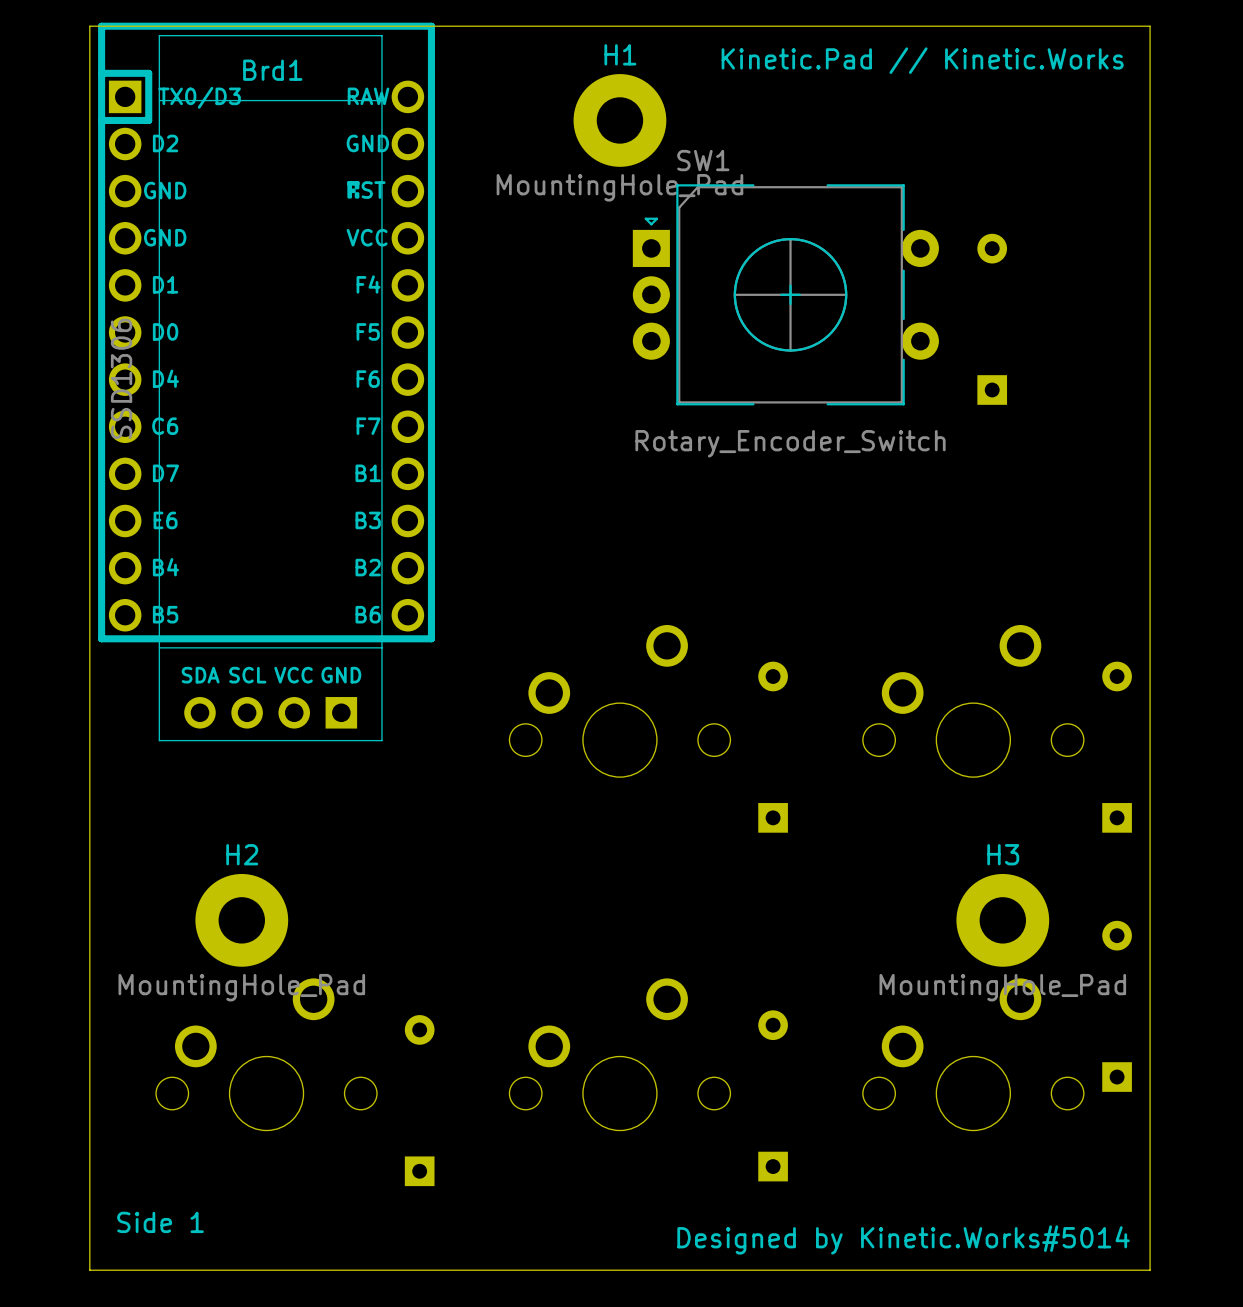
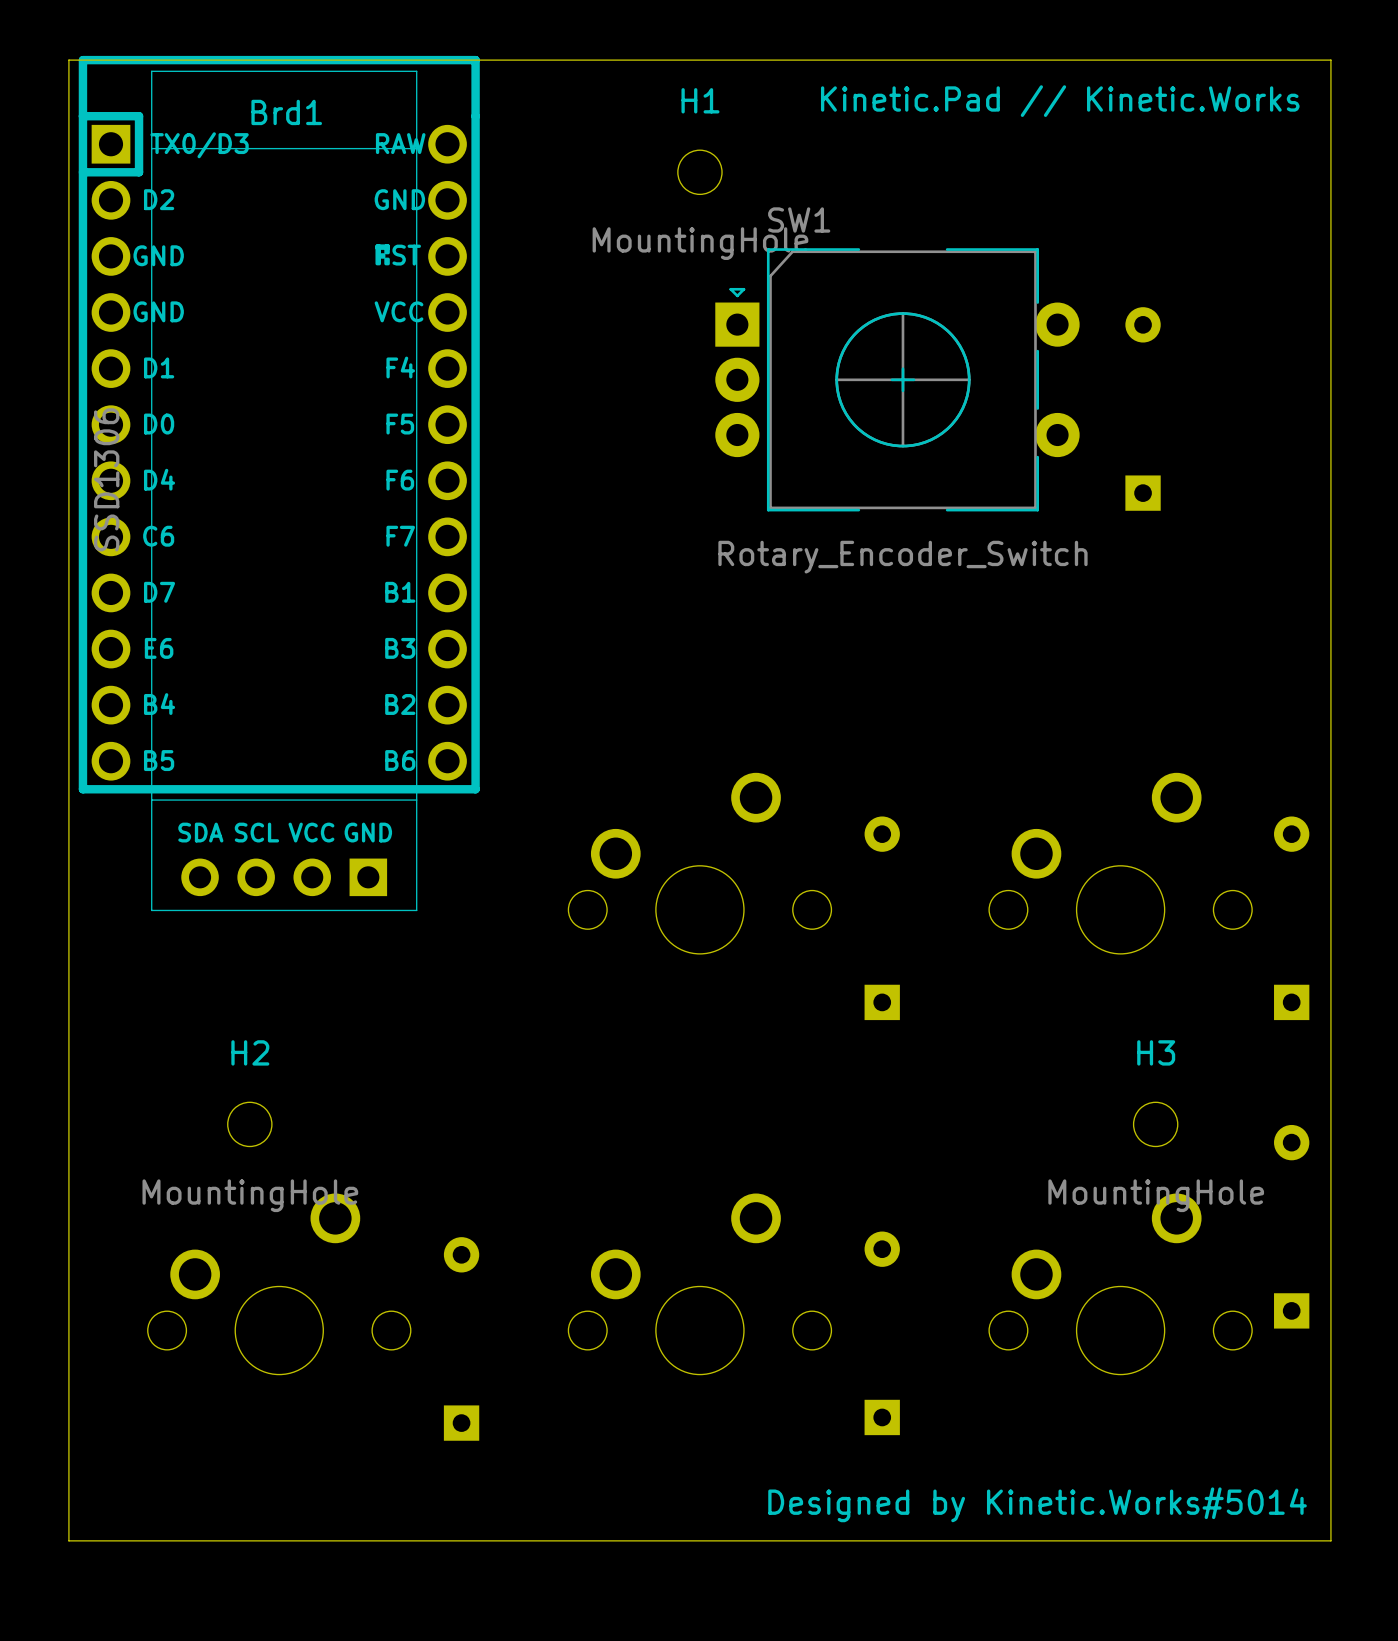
H1 footprint: [573, 74, 667, 167] -> [677, 150, 723, 195]
H1 value: MountingHole_Pad (619, 187) -> MountingHole (700, 243)
H2 footprint: [195, 873, 289, 967] -> [227, 1102, 272, 1147]
H3 footprint: [956, 873, 1050, 967] -> [1133, 1102, 1178, 1147]
H2 value: MountingHole_Pad (241, 987) -> MountingHole (250, 1195)
H3 value: MountingHole_Pad (1002, 987) -> MountingHole (1156, 1195)
text: Side 1 (160, 1222) -> none

